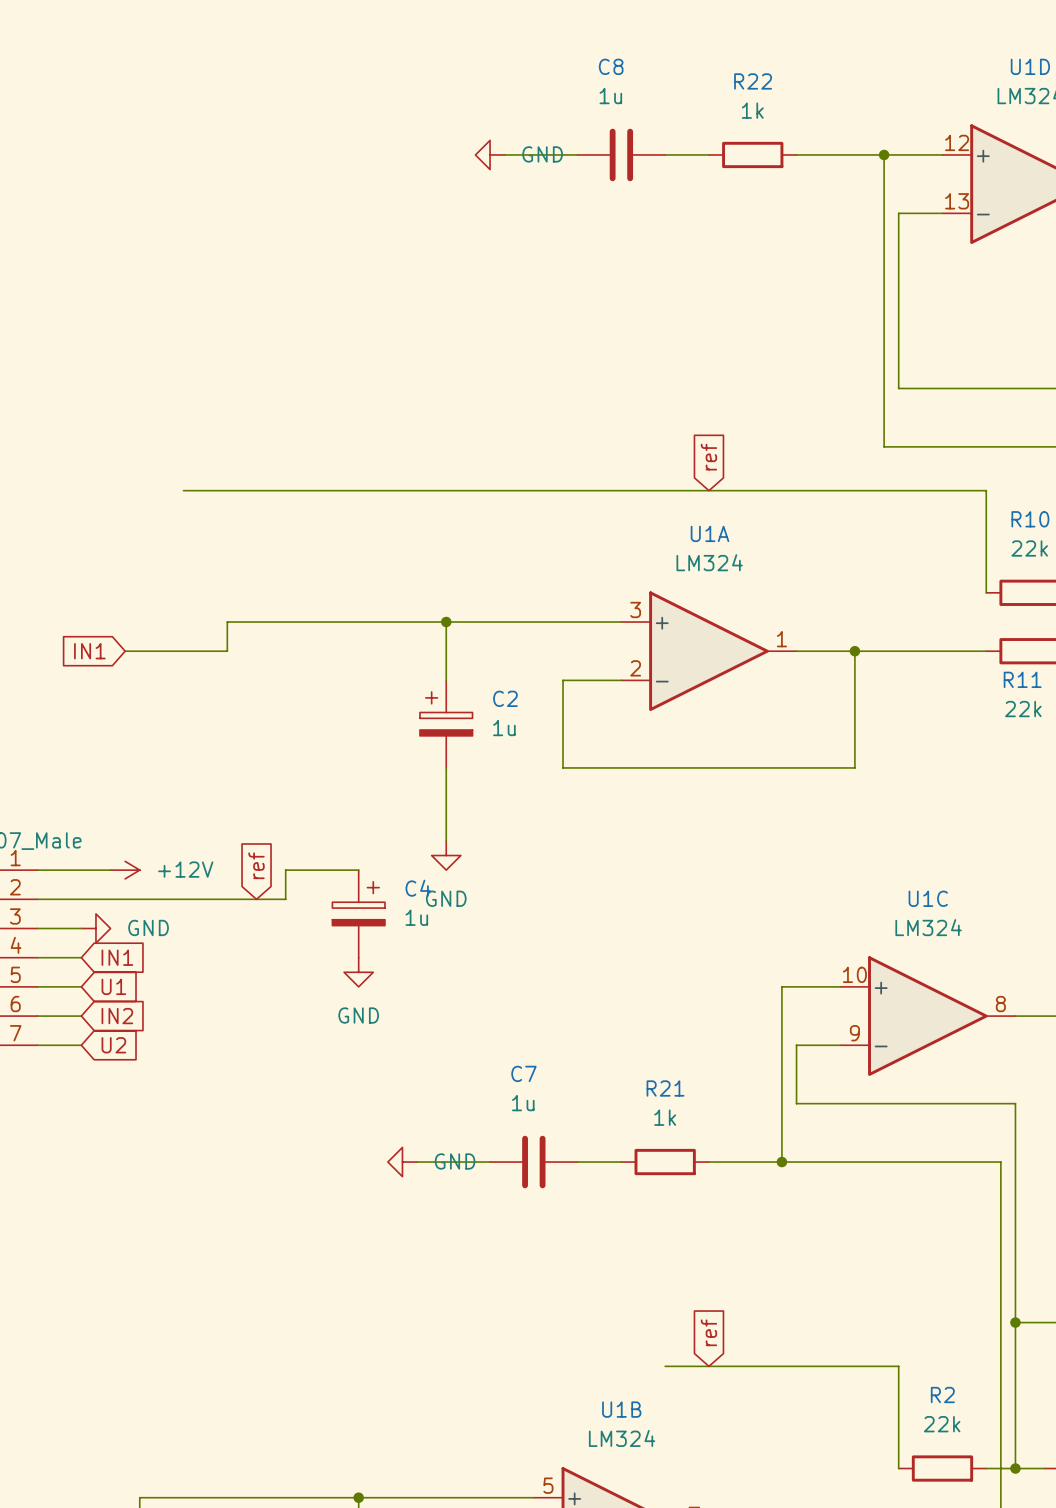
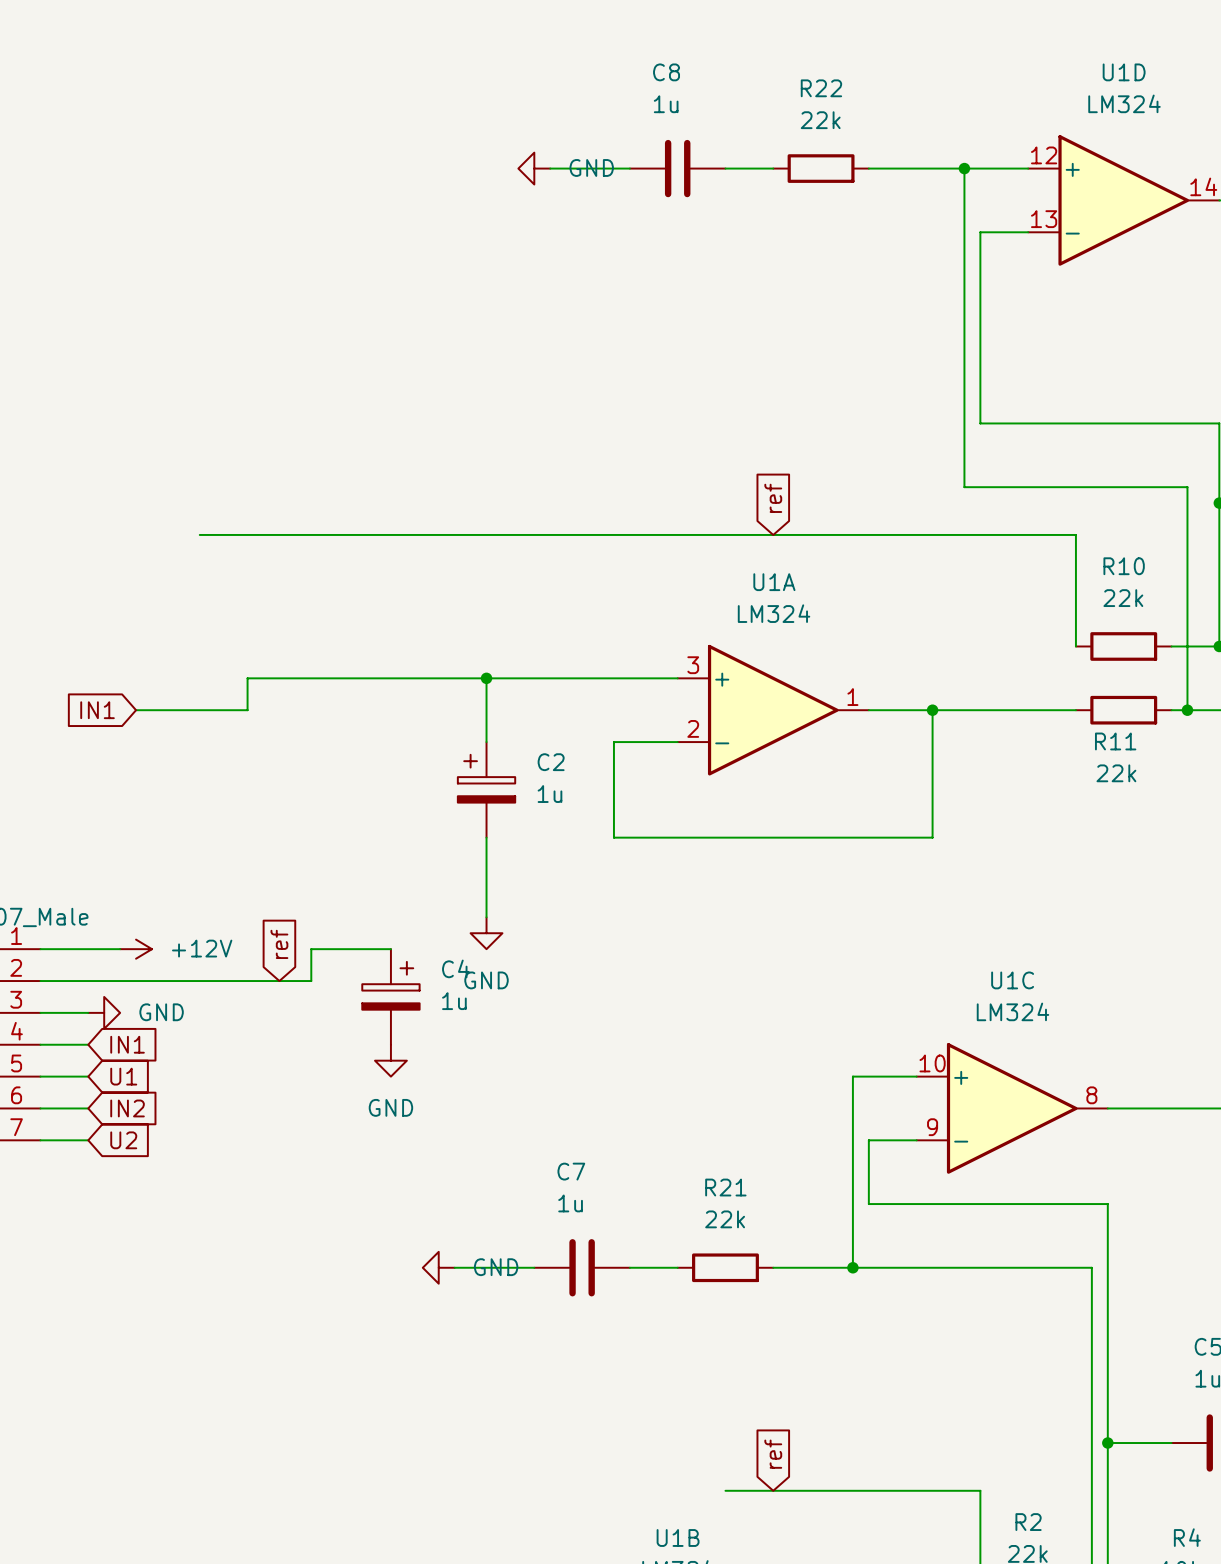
R22 value: 1k (752, 110) -> 22k (820, 120)
R21 value: 1k (665, 1117) -> 22k (725, 1219)

